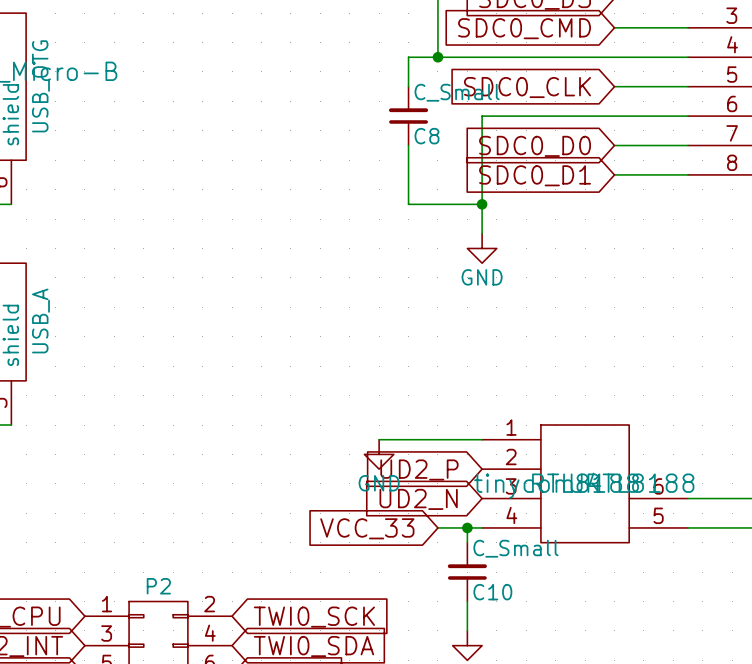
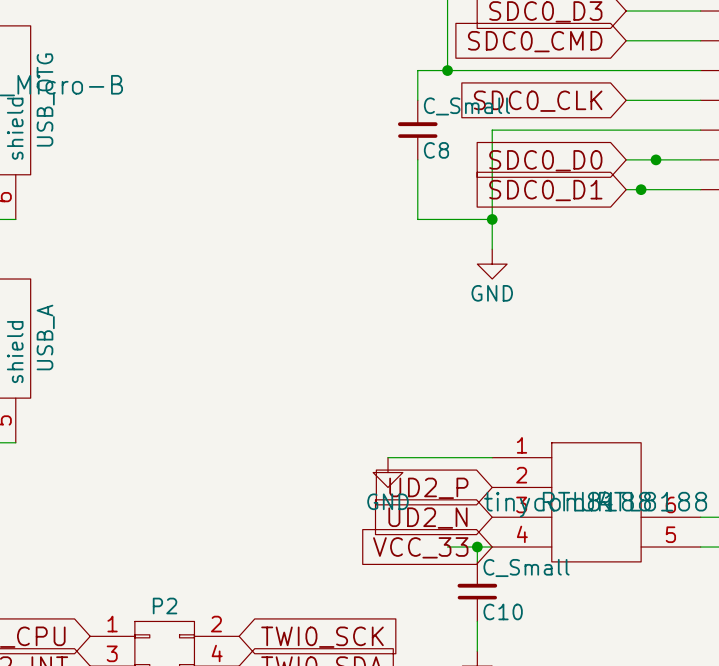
junction: none -> (656, 159)
junction: none -> (641, 189)
global label position: VCC_33 (367, 528) -> VCC_33 (420, 547)

